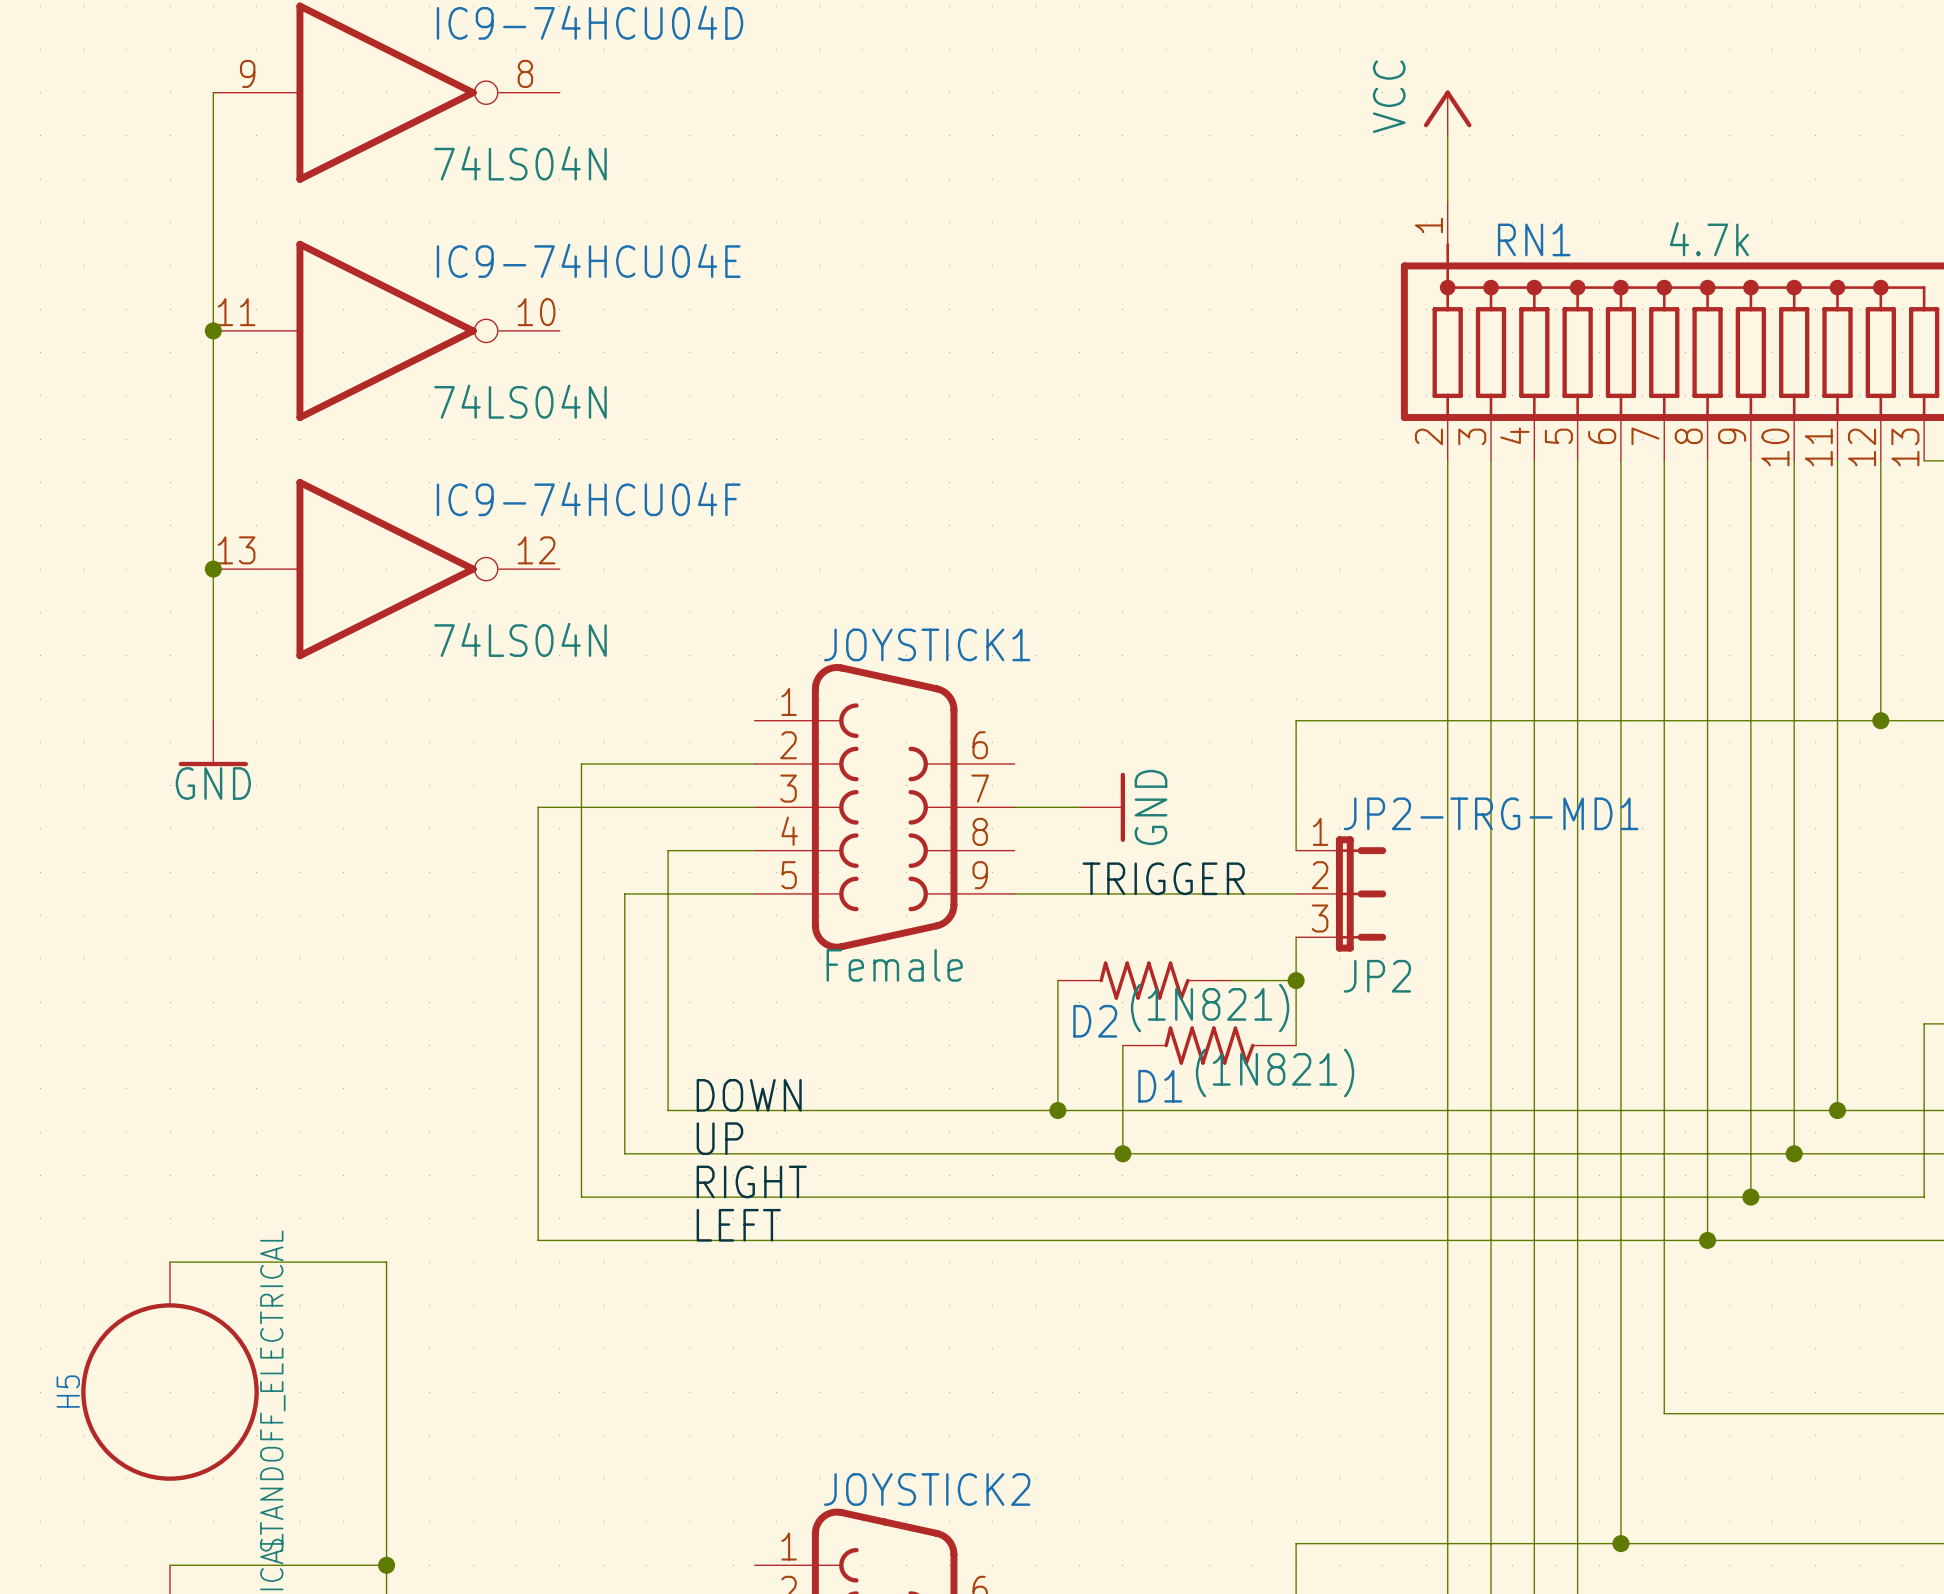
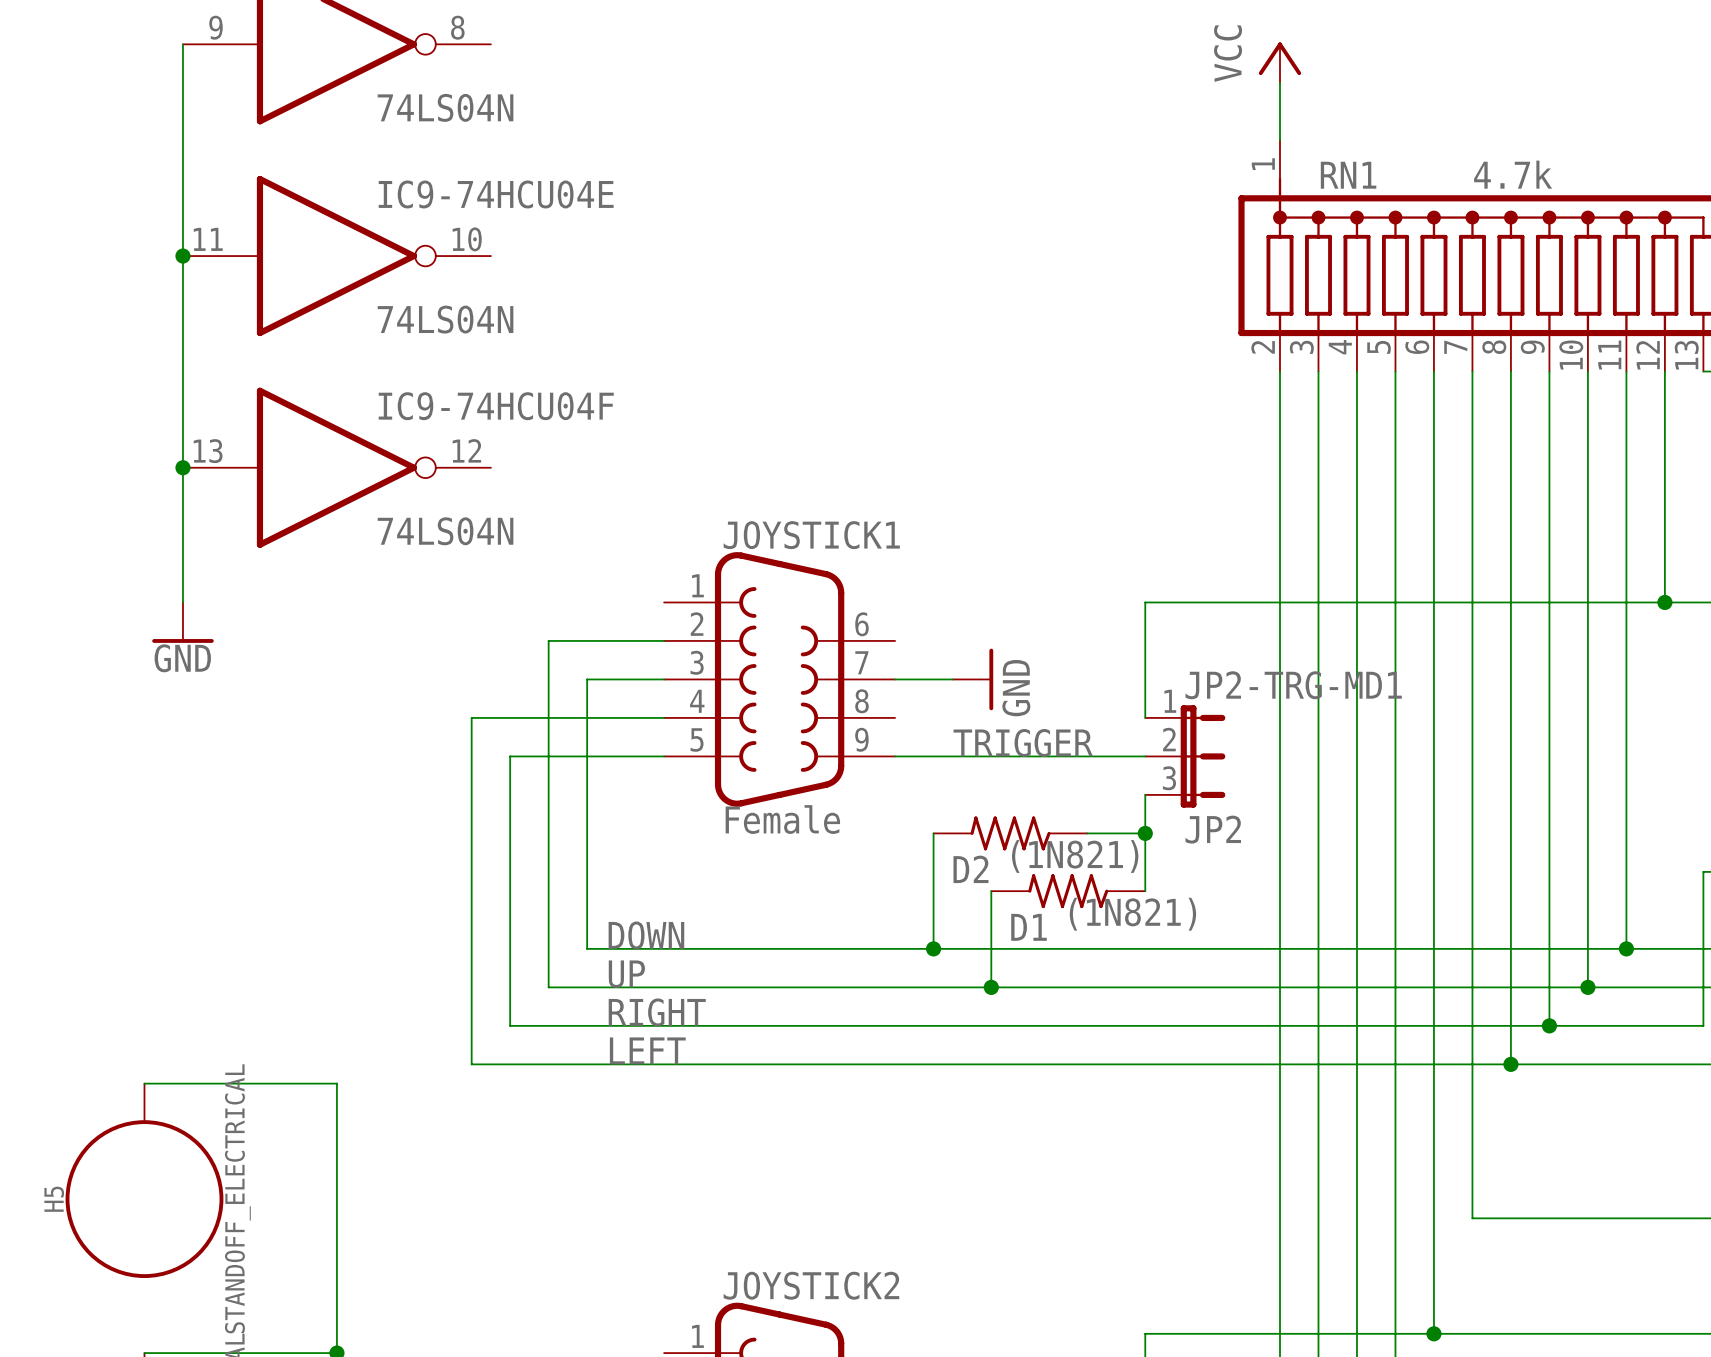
wire: (624, 764) (581, 764) (581, 893) -> (548, 640) (548, 756) (510, 756)
wire: (668, 807) (538, 807) (538, 850) -> (587, 679) (587, 717) (471, 717)

